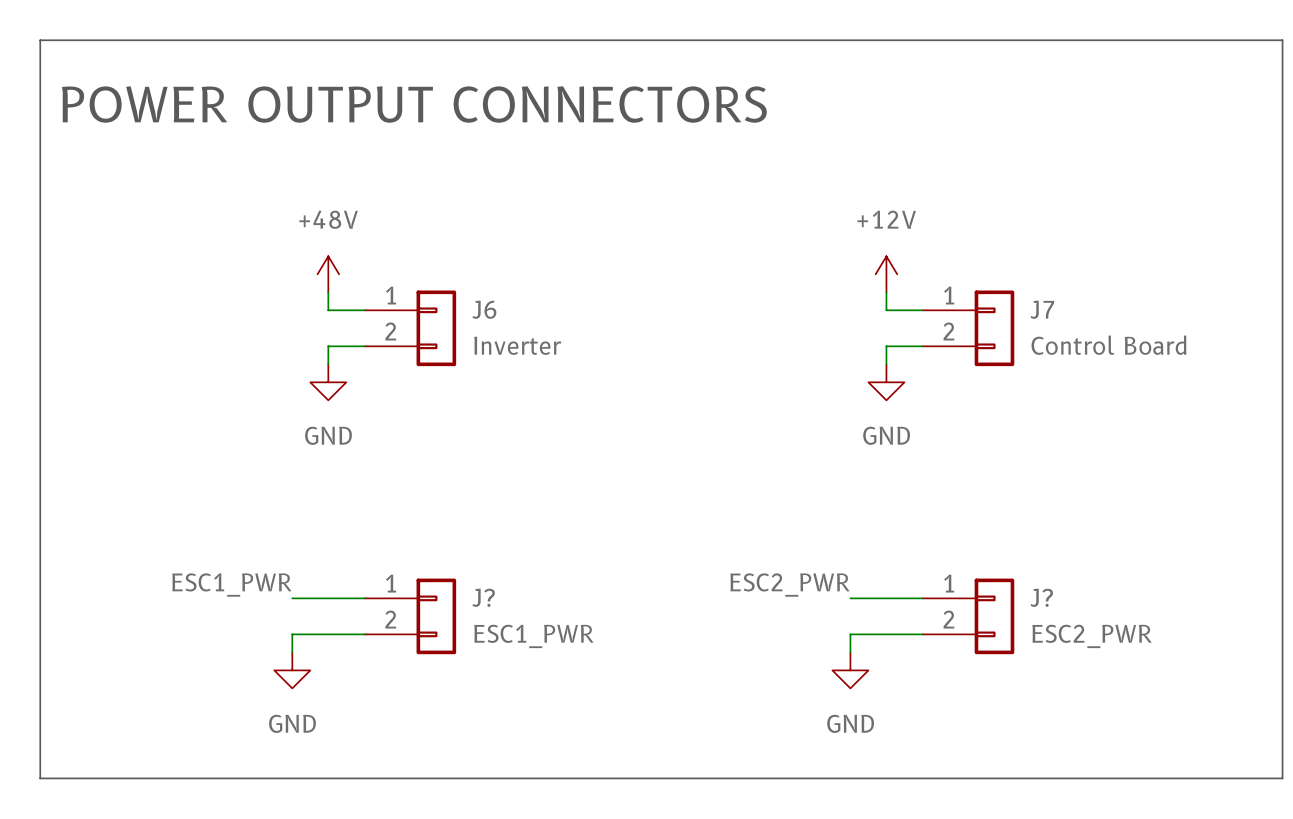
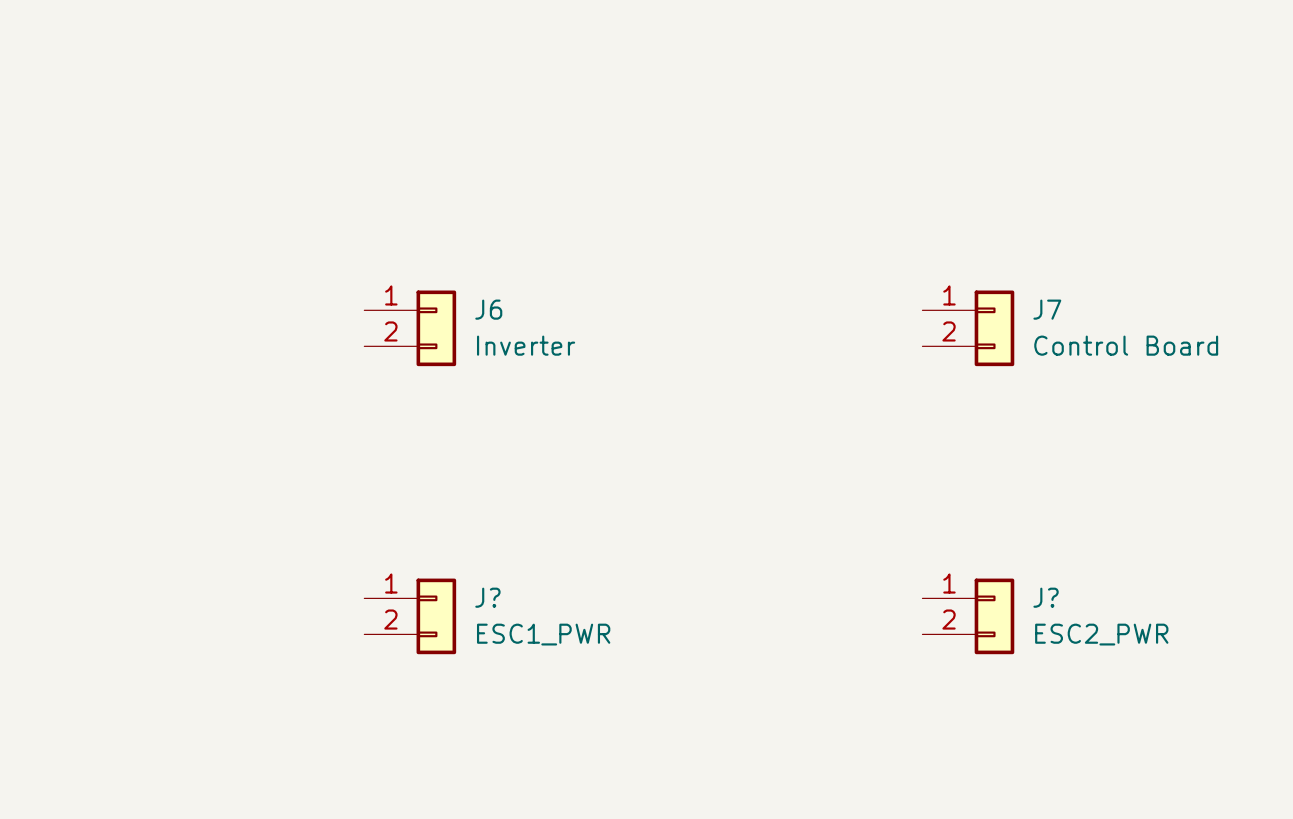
line: (40, 40) (1282, 40) (1282, 778) (40, 778) (40, 40) -> none
text: POWER OUTPUT CONNECTORS (414, 104) -> none
power symbol: +48V (328, 274) -> none
power symbol: +12V (886, 274) -> none
wire: (328, 292) (328, 310) (364, 310) -> none
wire: (886, 292) (886, 310) (922, 310) -> none
wire: (364, 346) (328, 346) (328, 364) -> none
wire: (922, 346) (886, 346) (886, 364) -> none
power symbol: GND (328, 382) -> none
power symbol: GND (886, 382) -> none
label: ESC1_PWR (231, 585) -> none
label: ESC2_PWR (789, 585) -> none
wire: (292, 598) (364, 598) -> none
wire: (850, 598) (922, 598) -> none
wire: (364, 634) (292, 634) (292, 652) -> none
wire: (922, 634) (850, 634) (850, 652) -> none
power symbol: GND (292, 670) -> none
power symbol: GND (850, 670) -> none

